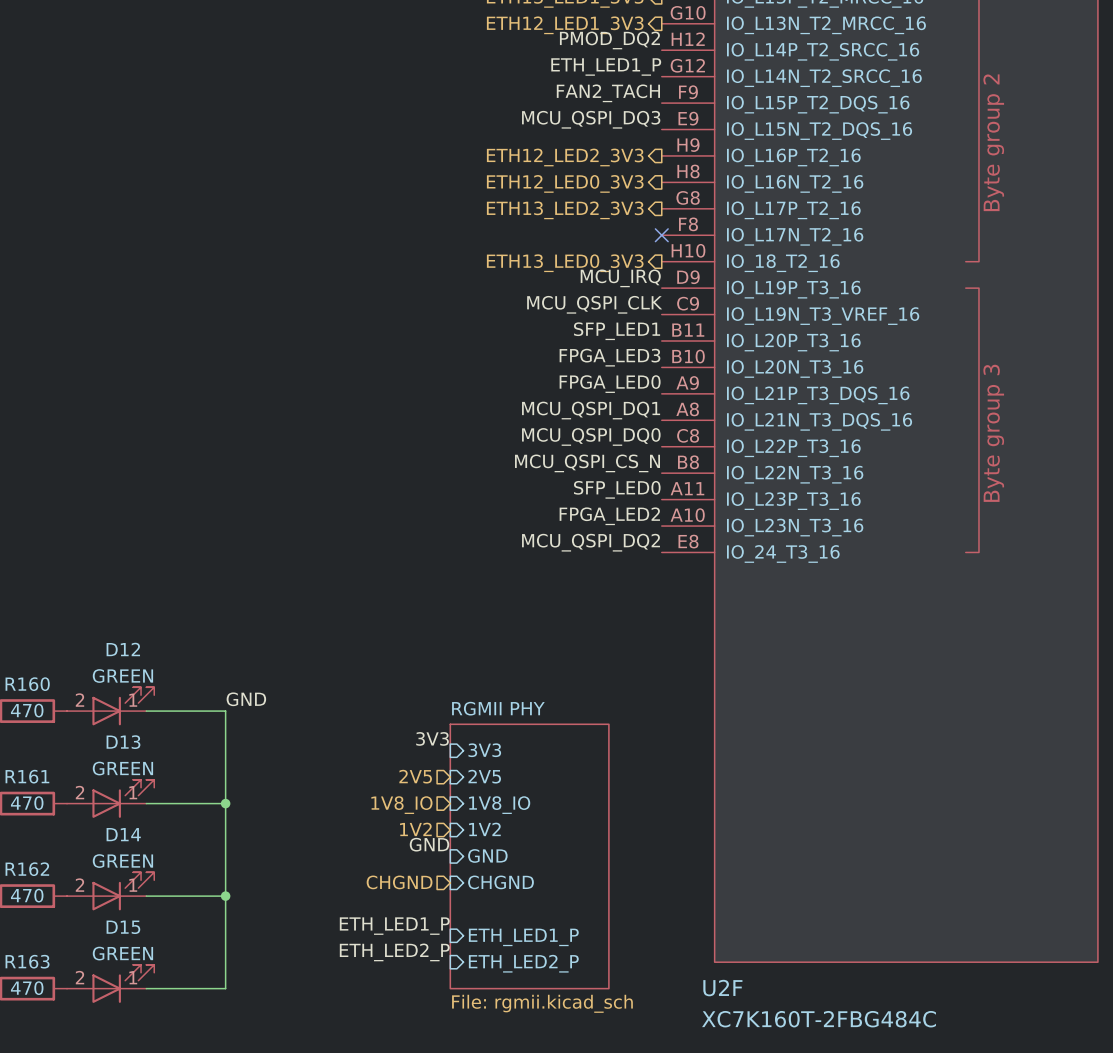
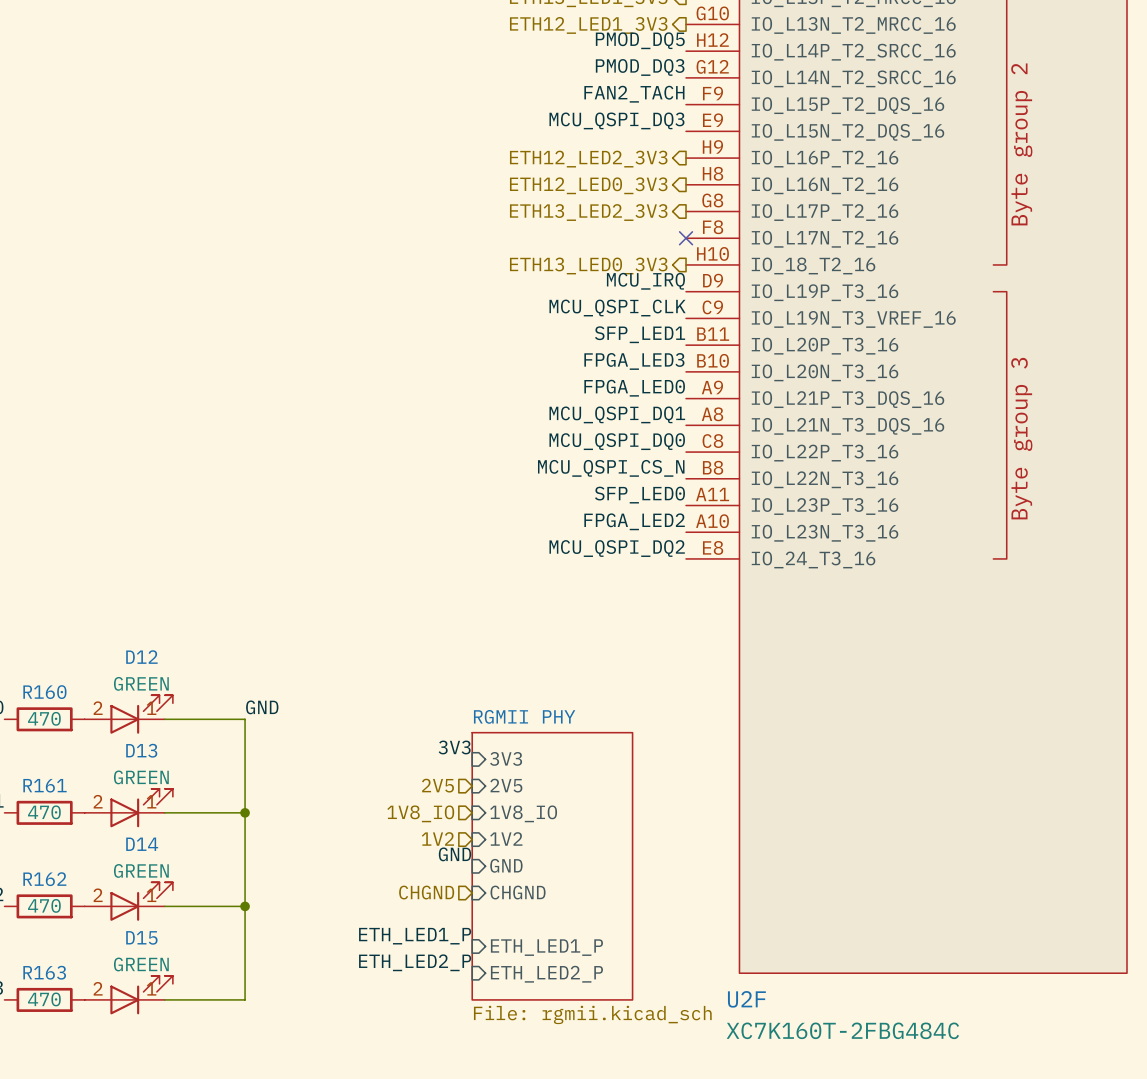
label: PMOD_DQ2 (609, 40) -> PMOD_DQ5 (640, 40)
label: ETH_LED1_P (606, 67) -> PMOD_DQ3 (640, 67)

